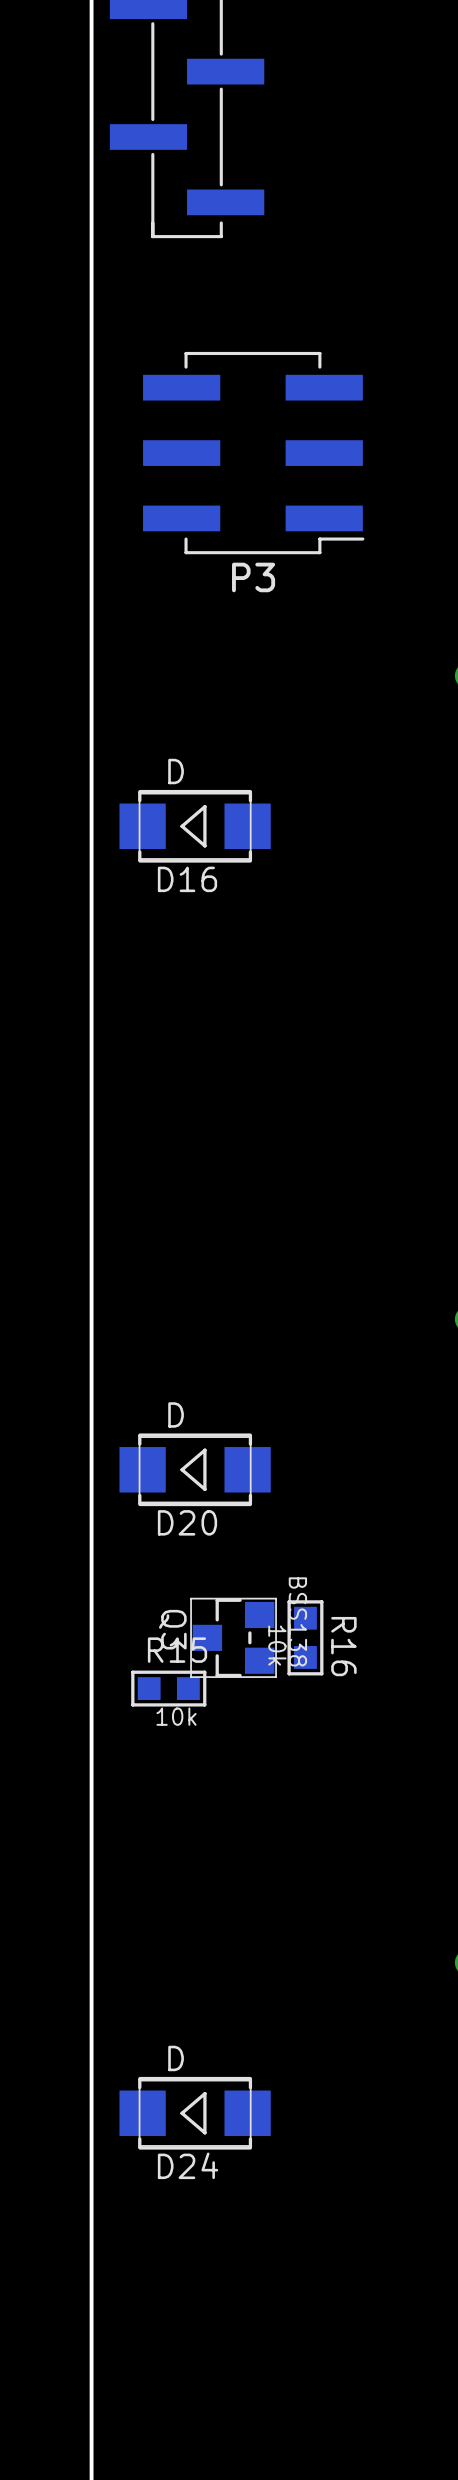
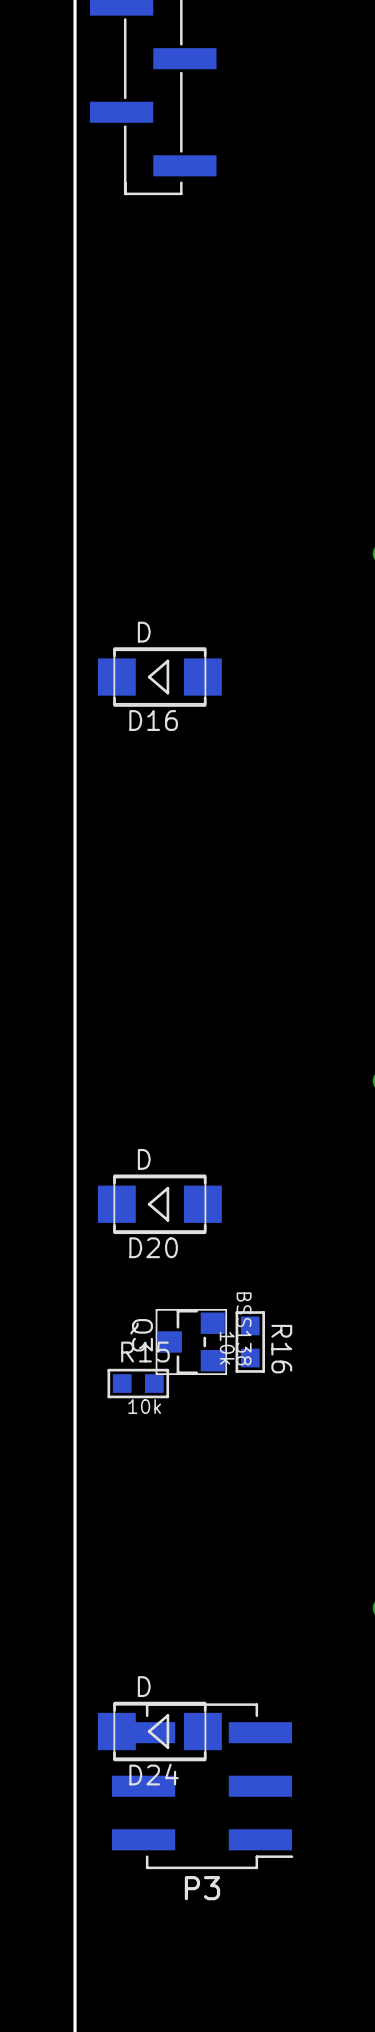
P3 position: (253, 453) -> (202, 1786)

